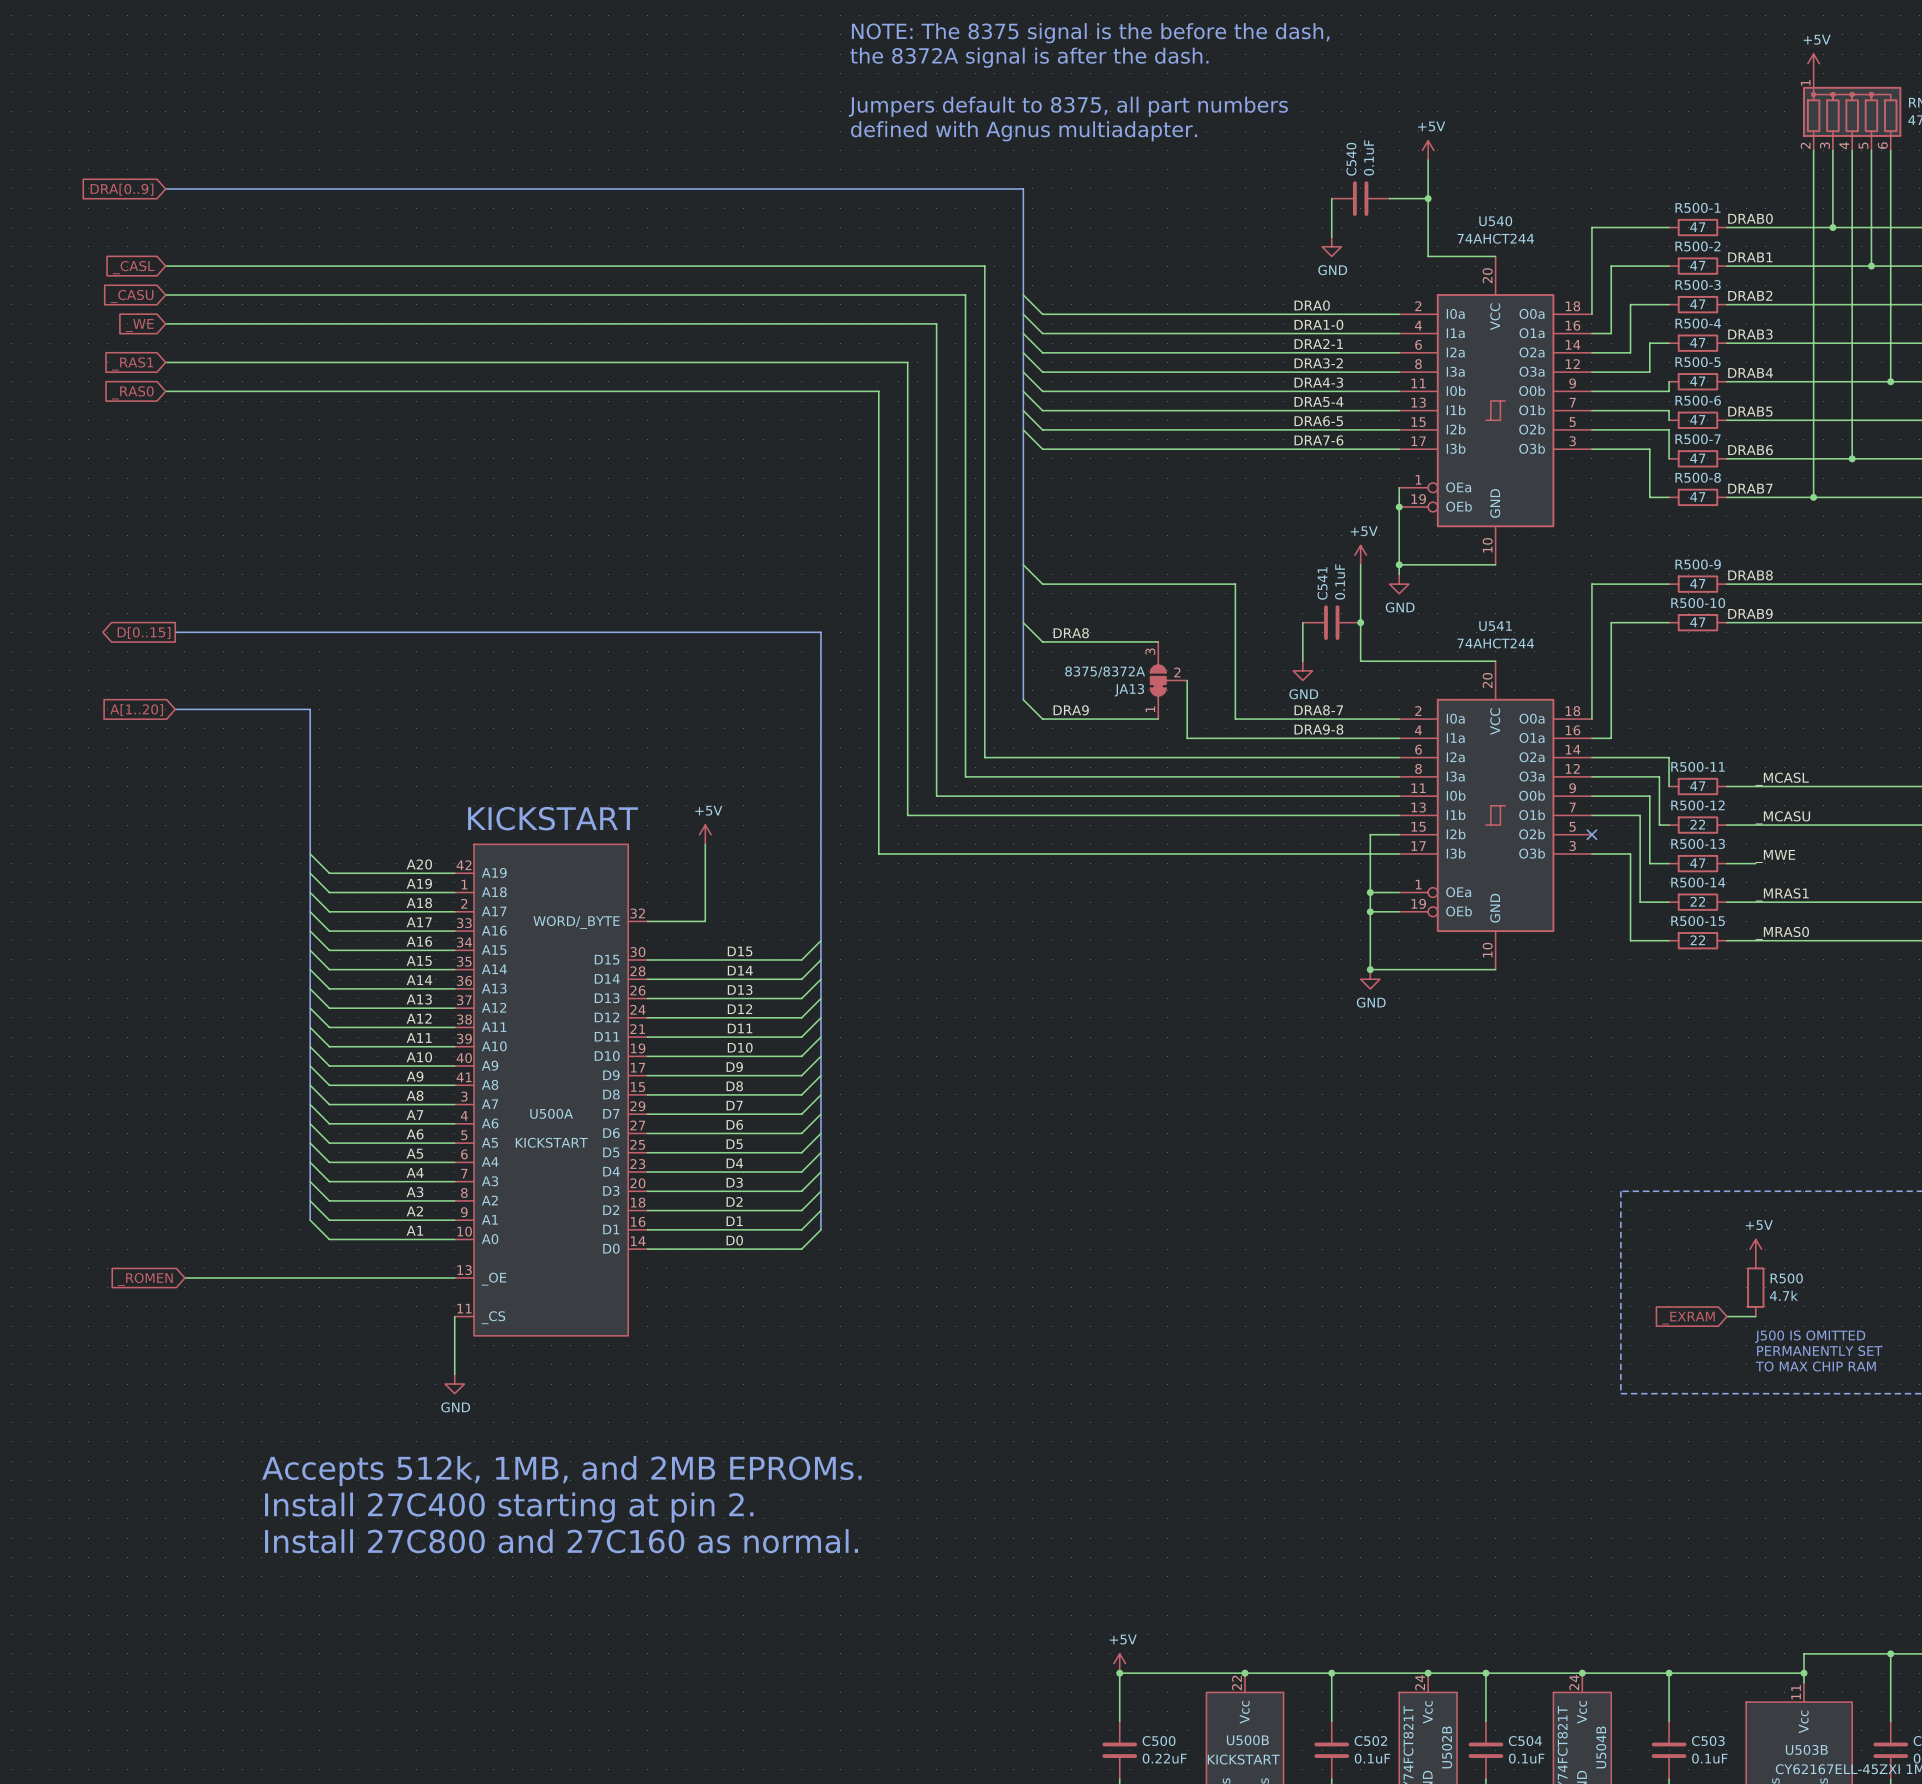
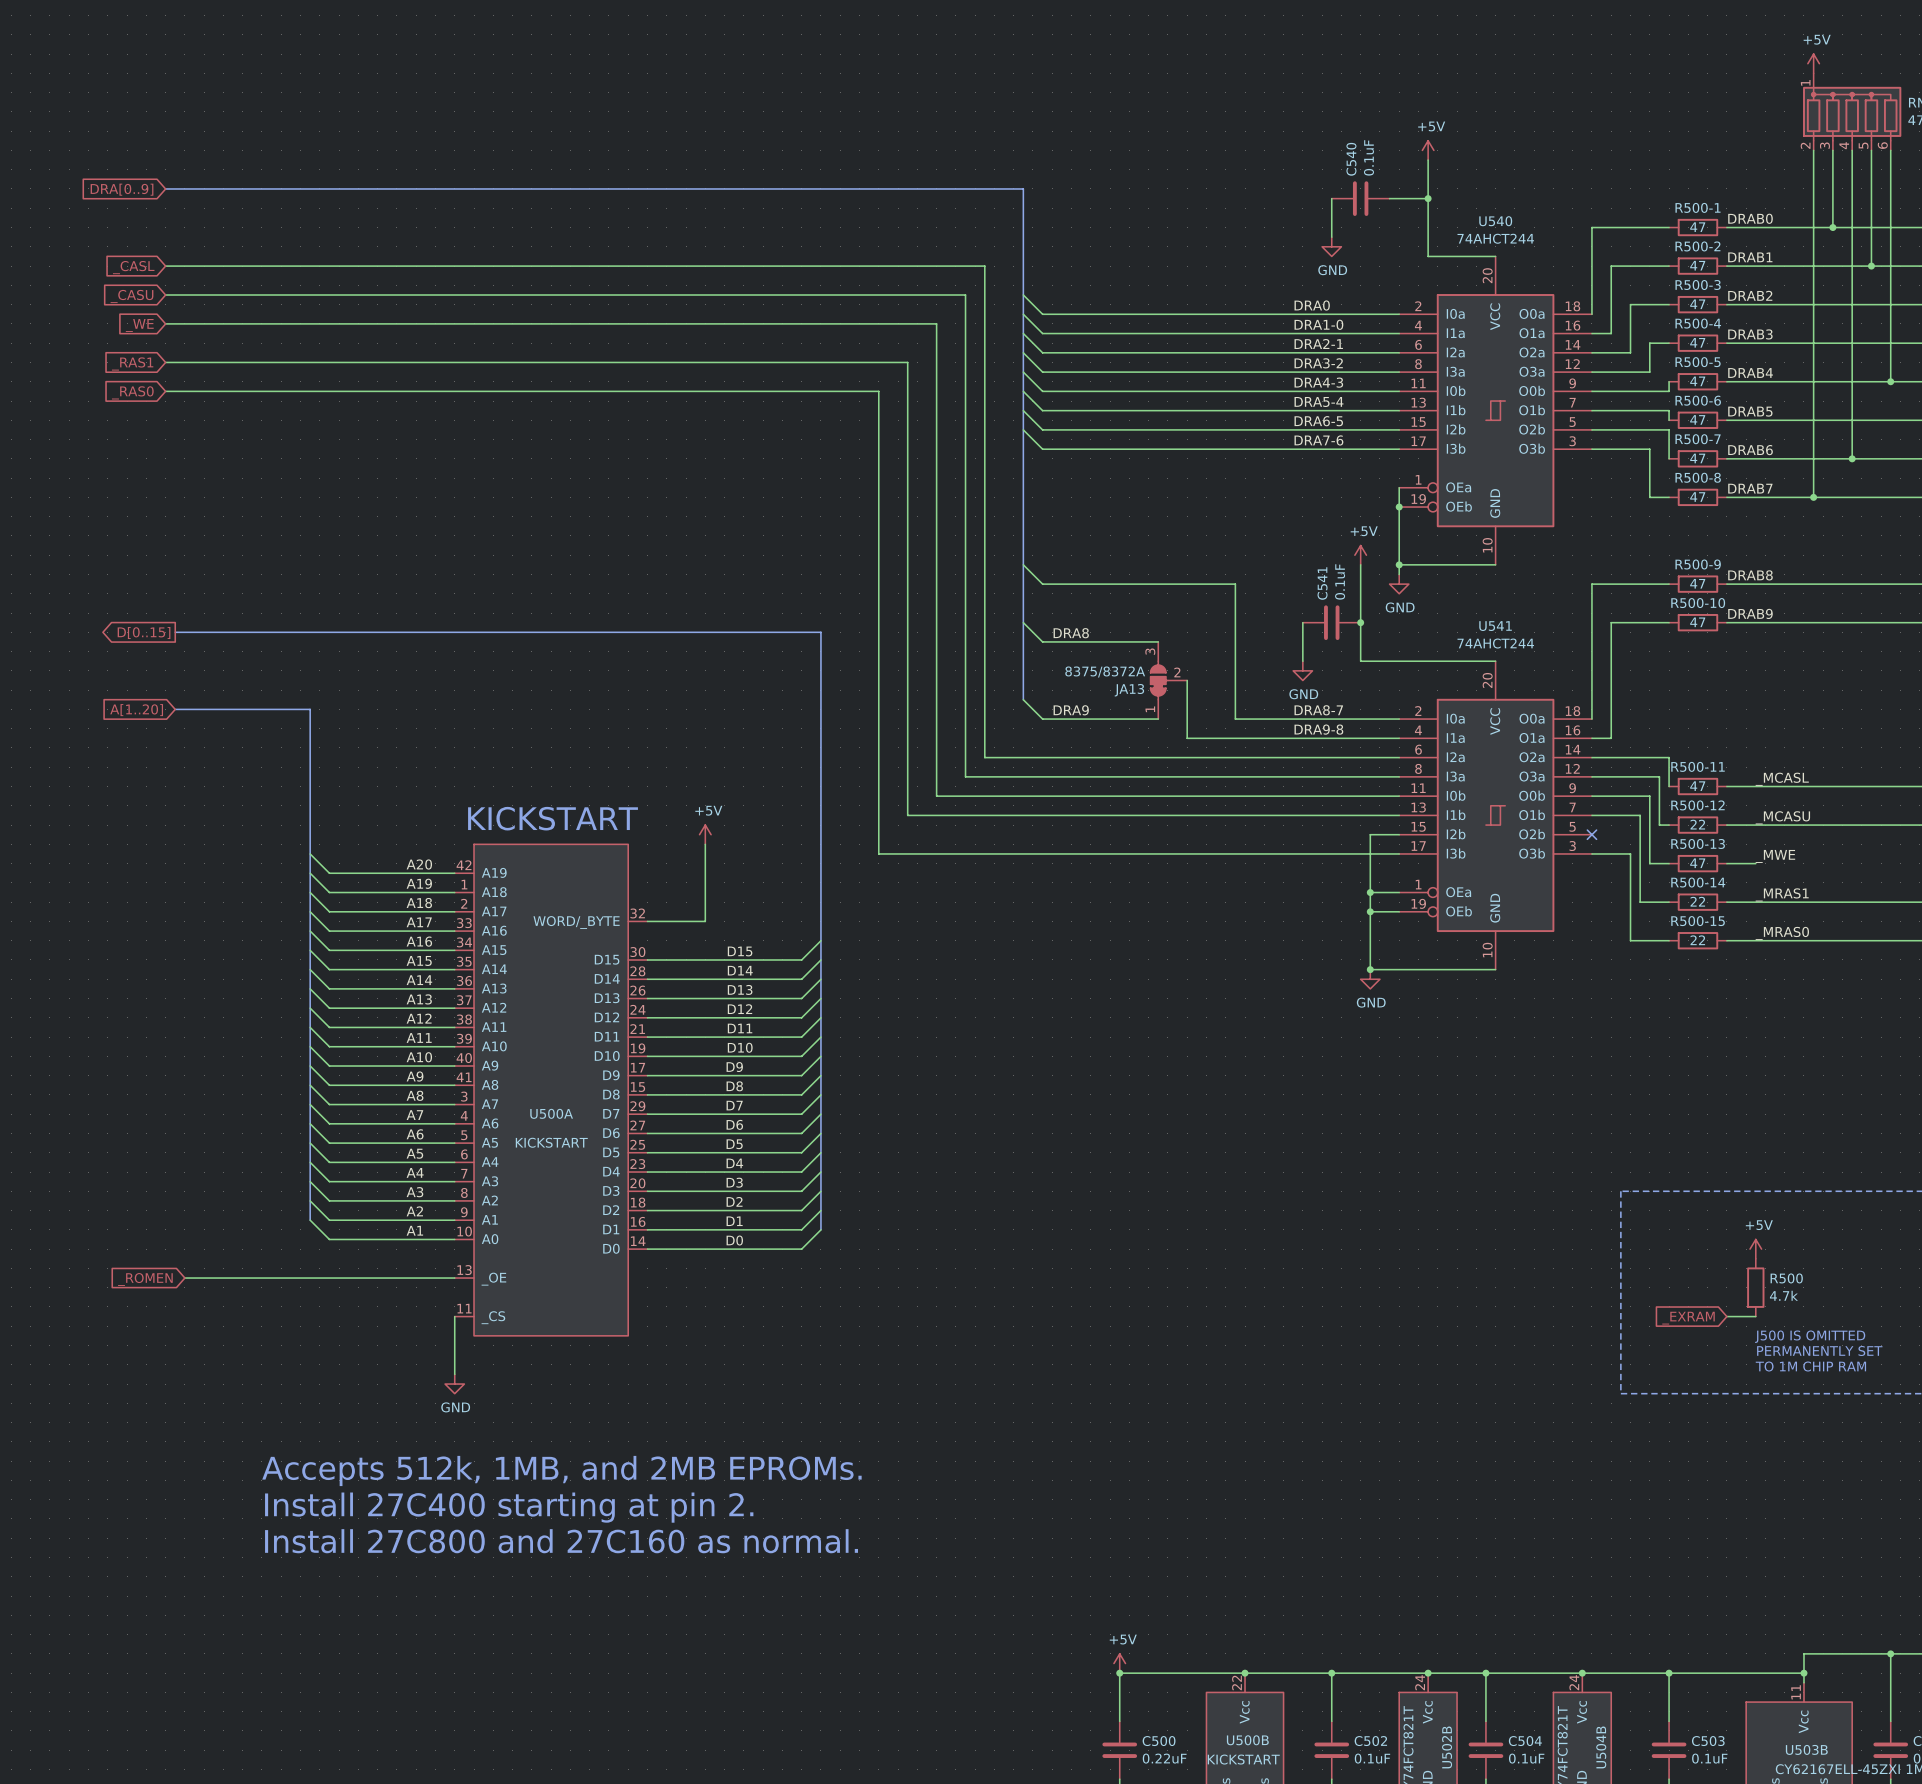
text: NOTE: The 8375 signal is the before the dash, (1090, 33) -> none
text: the 8372A signal is after the dash. (1029, 57) -> none
text: Jumpers default to 8375, all part numbers (1068, 106) -> none
text: defined with Agnus multiadapter. (1024, 131) -> none
text: TO MAX CHIP RAM (1815, 1366) -> TO 1M CHIP RAM (1810, 1366)

